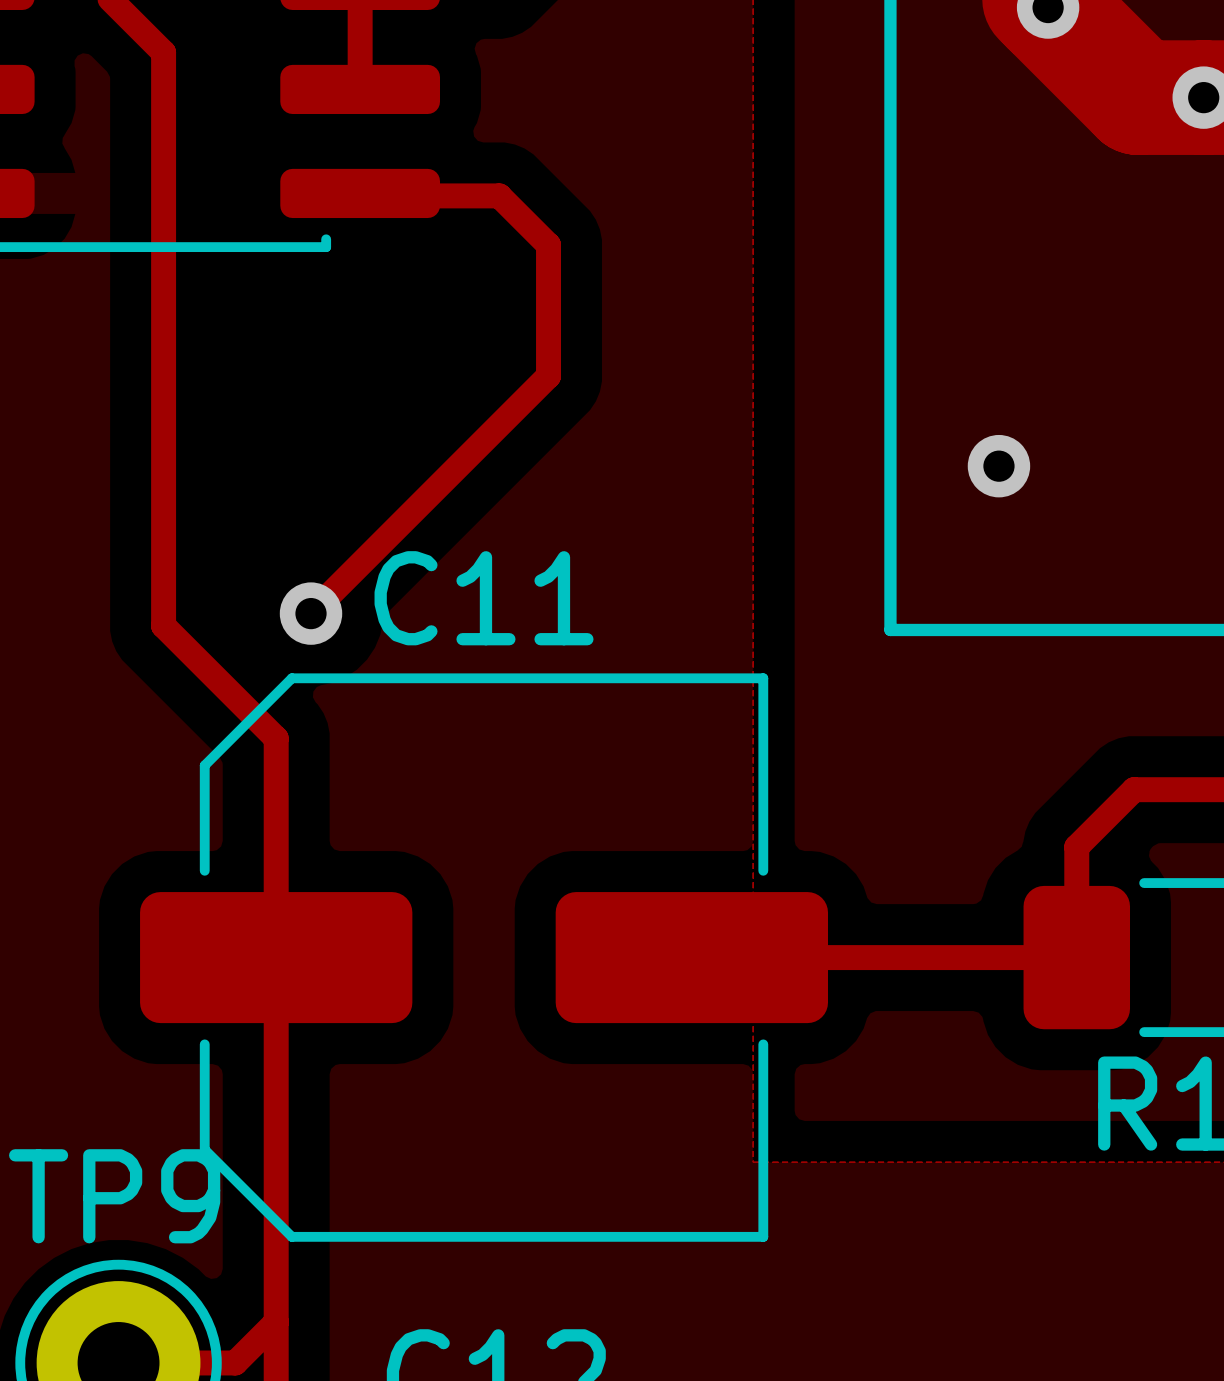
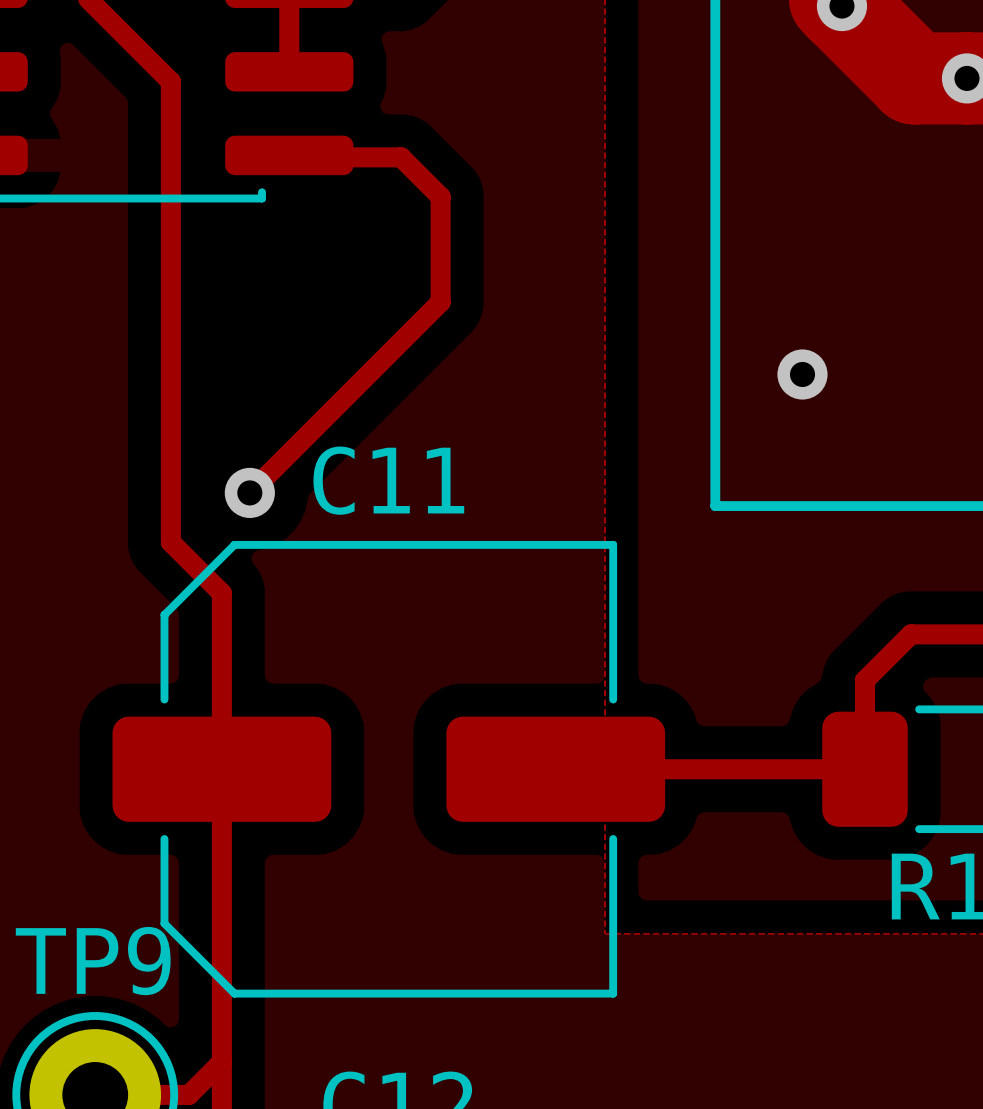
track: (163, 52) (163, 625) (212, 675) -> (131, 42) (170, 81) (170, 542)

